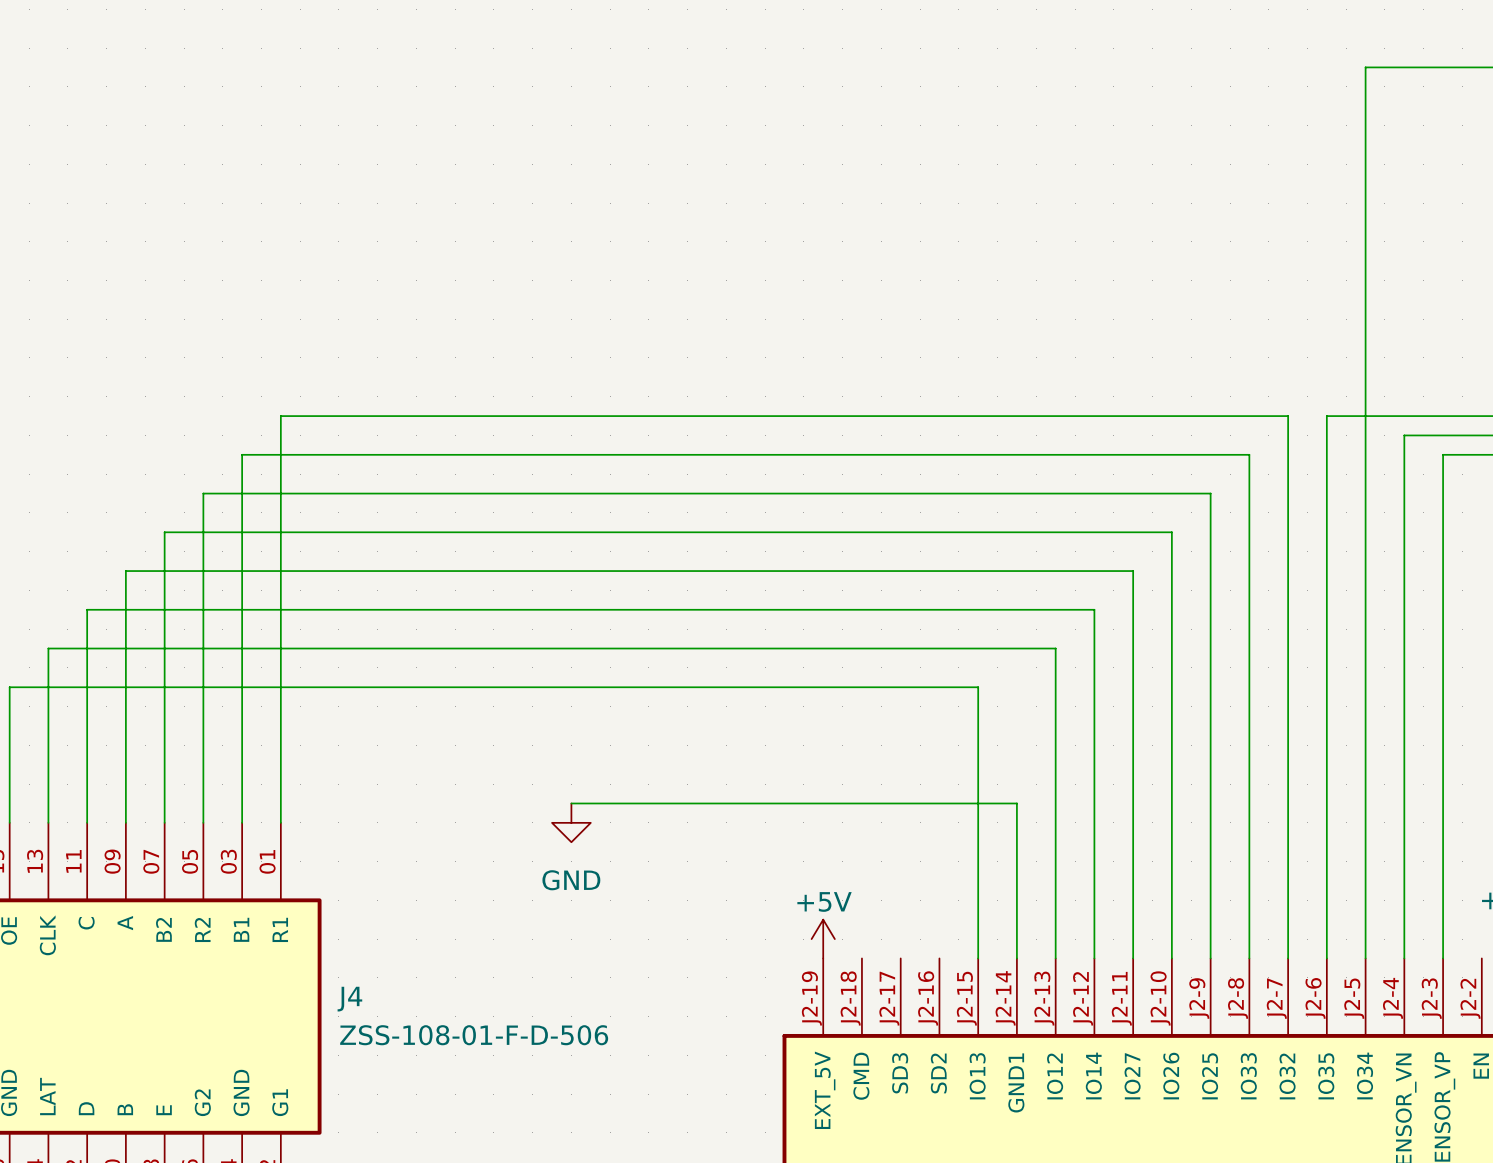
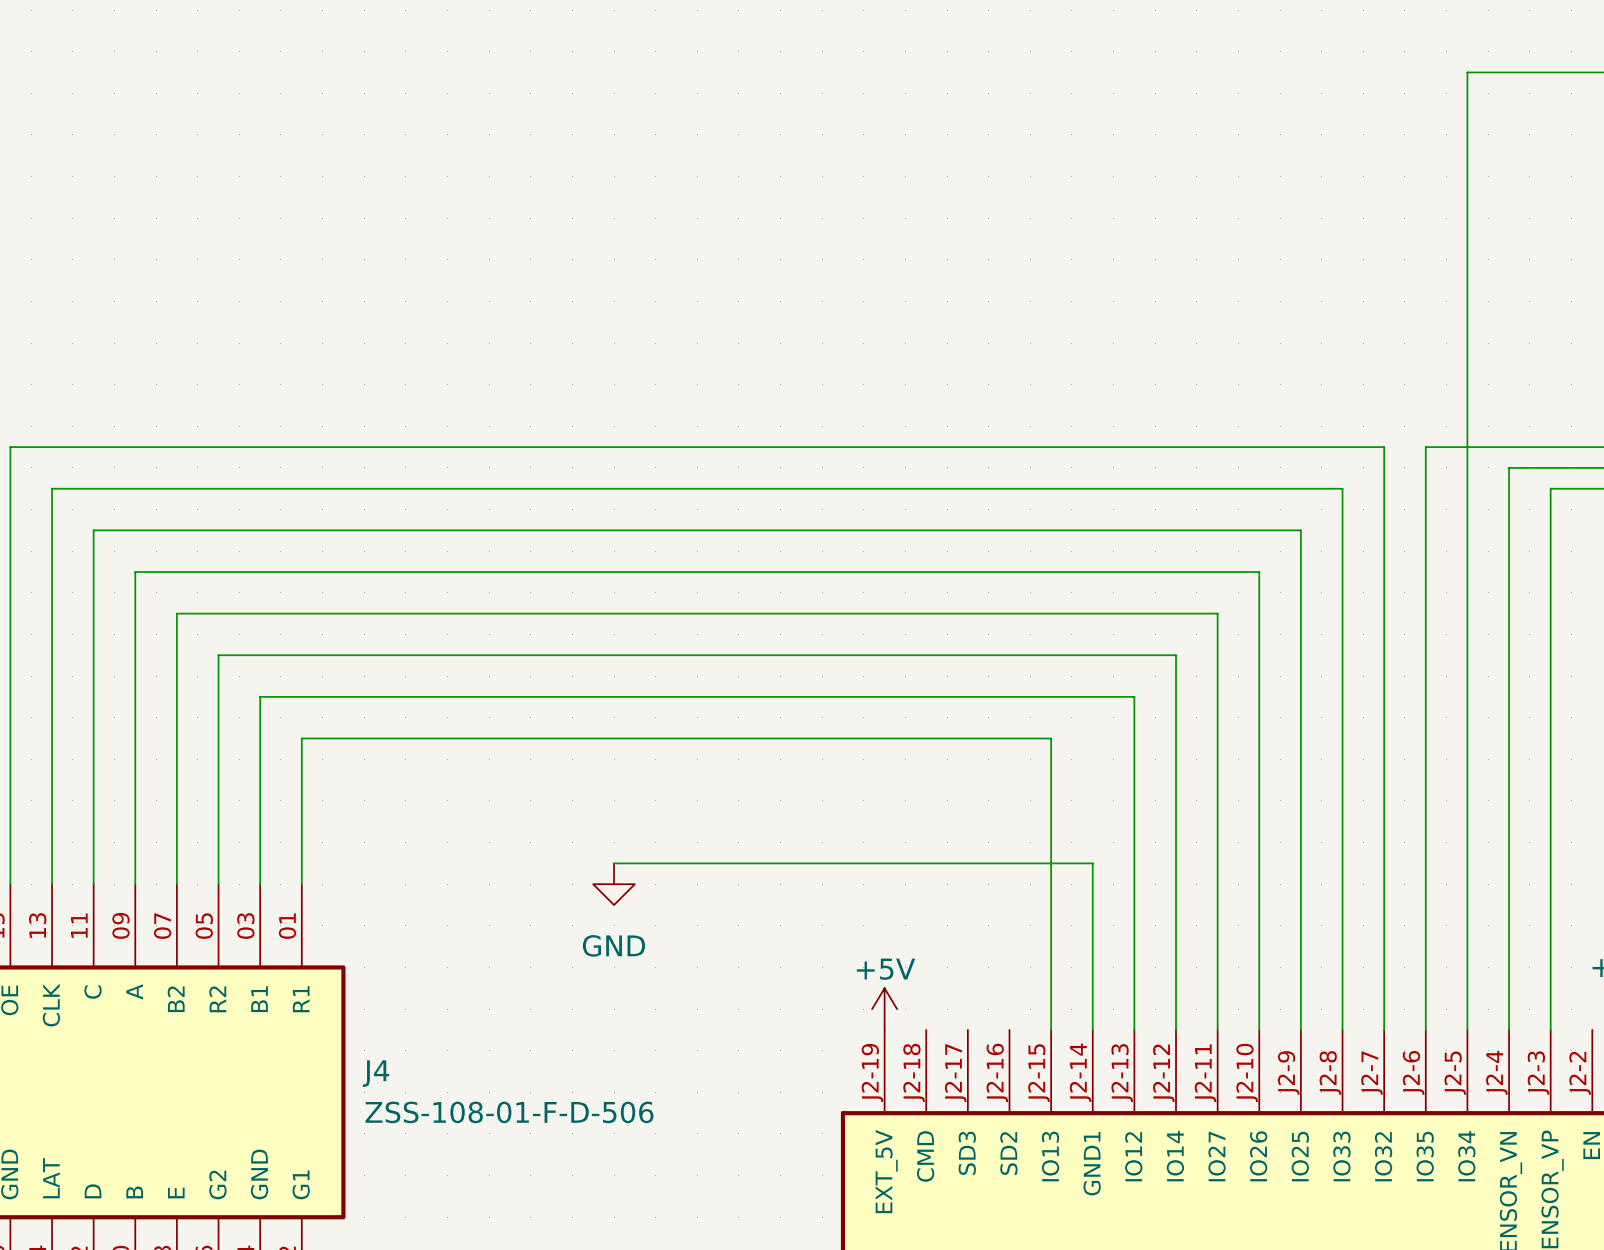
wire: (280, 416) (280, 687) (9, 687) -> (301, 447) (10, 447) (10, 738)
wire: (242, 454) (242, 648) (48, 648) -> (260, 488) (52, 488) (52, 696)
wire: (203, 493) (203, 609) (87, 609) -> (218, 530) (93, 530) (93, 655)
wire: (164, 532) (164, 571) (125, 571) -> (176, 571) (135, 571) (135, 613)

